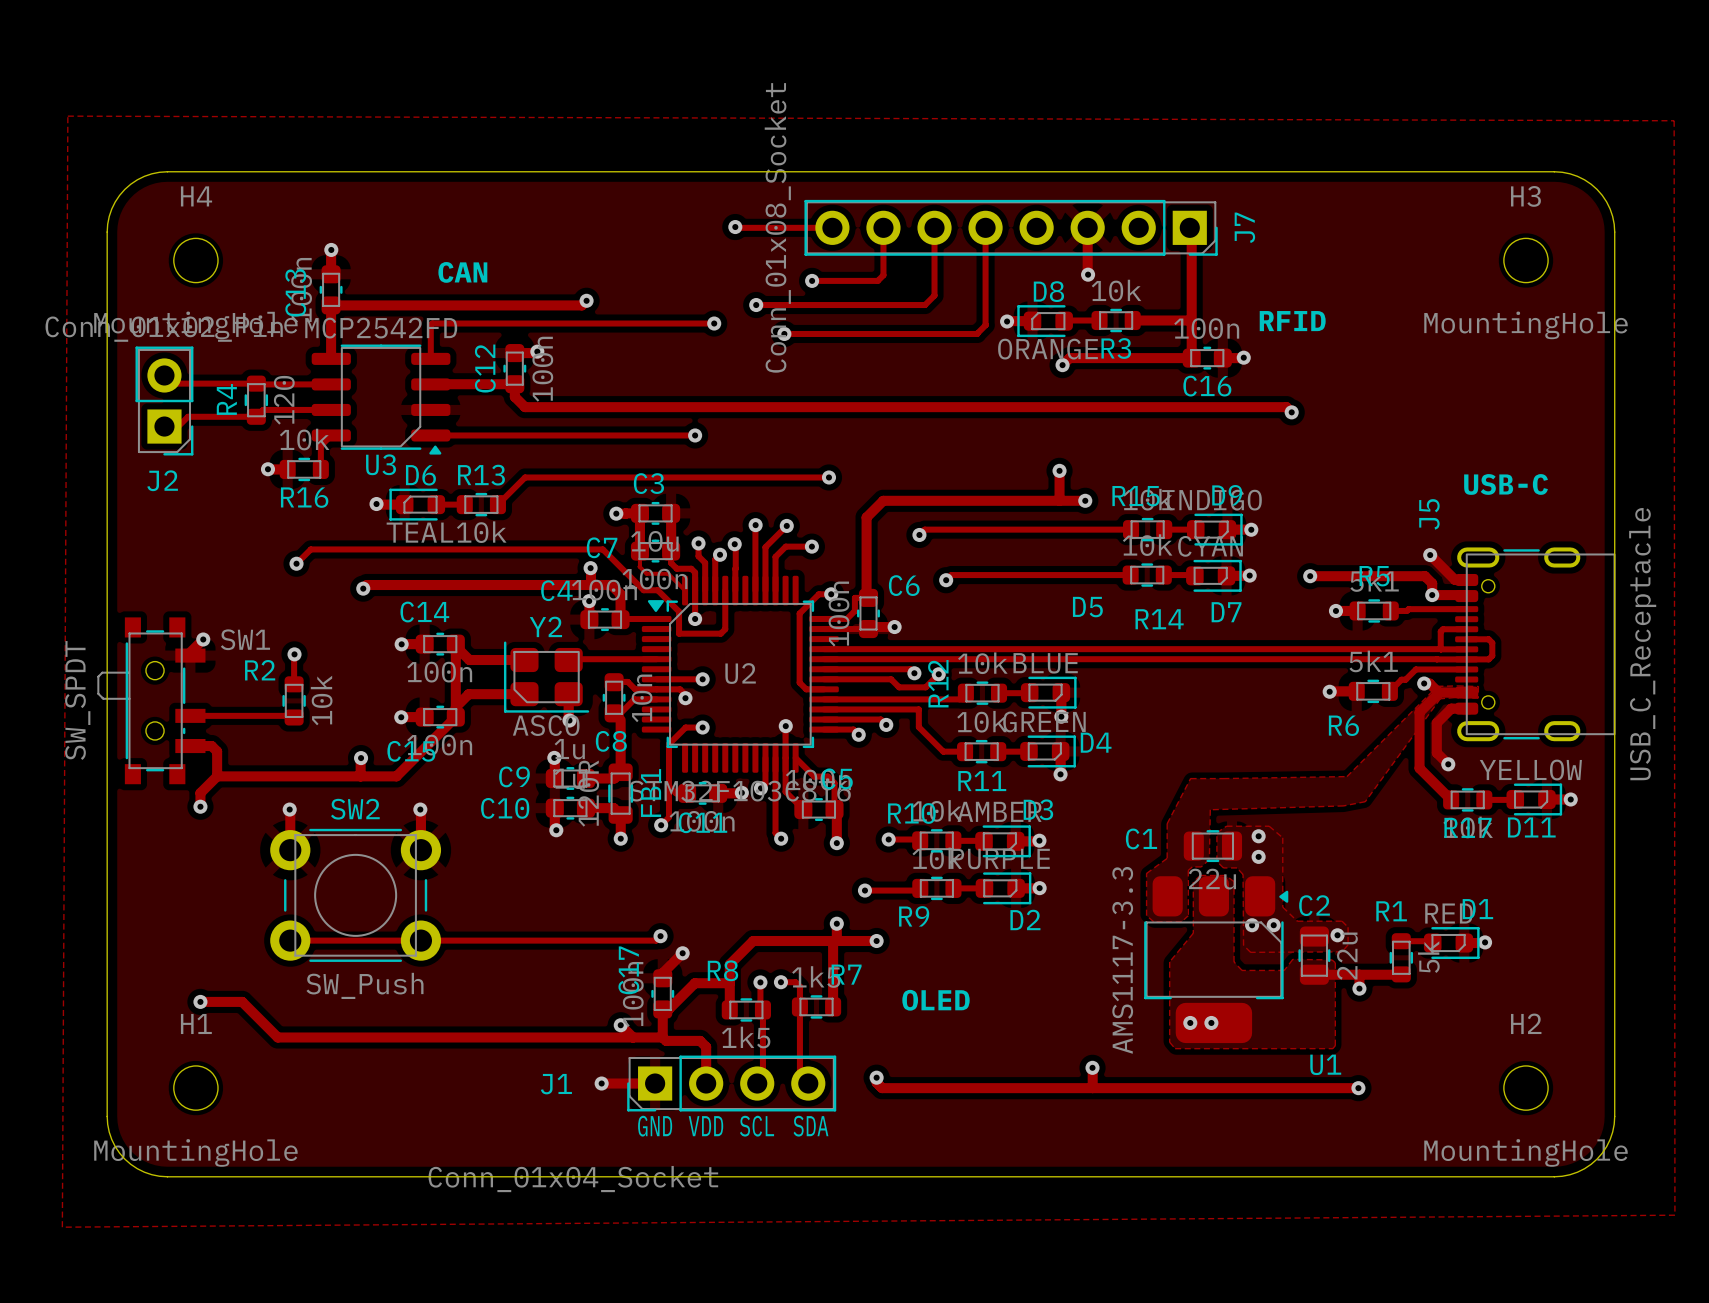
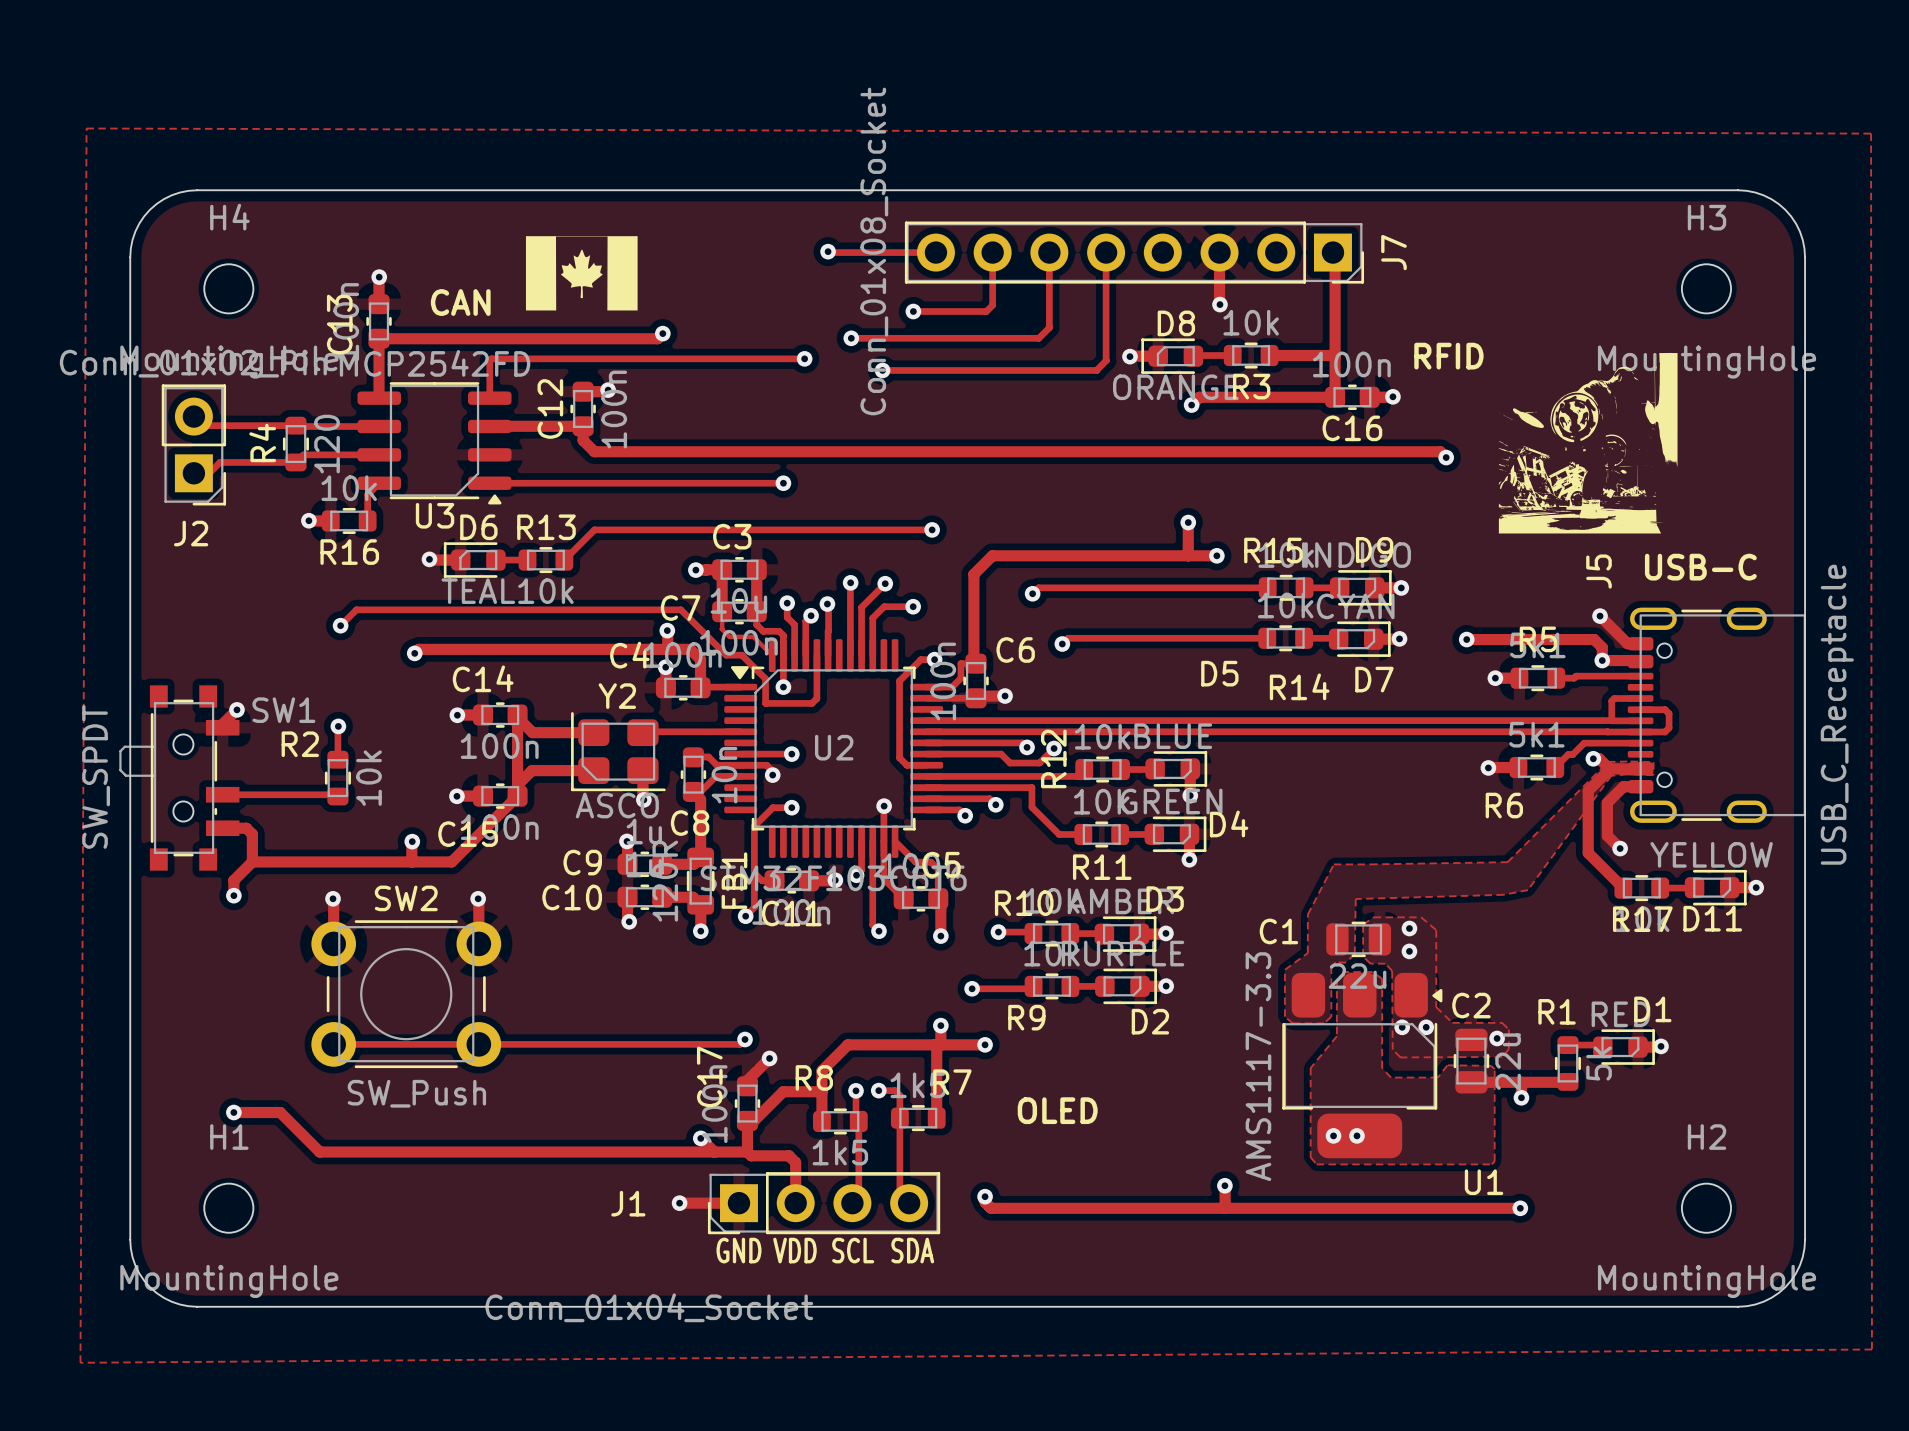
drawing: none -> [525, 236, 638, 311]
text position: CAN (462, 272) -> CAN (460, 302)
drawing: none -> [1498, 353, 1678, 534]
text position: USB-C (1506, 484) -> USB-C (1700, 567)

